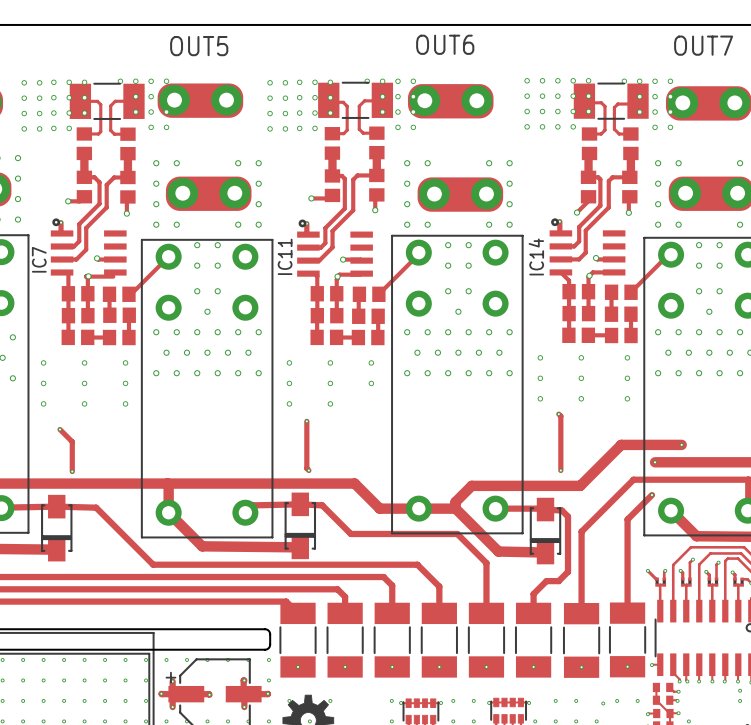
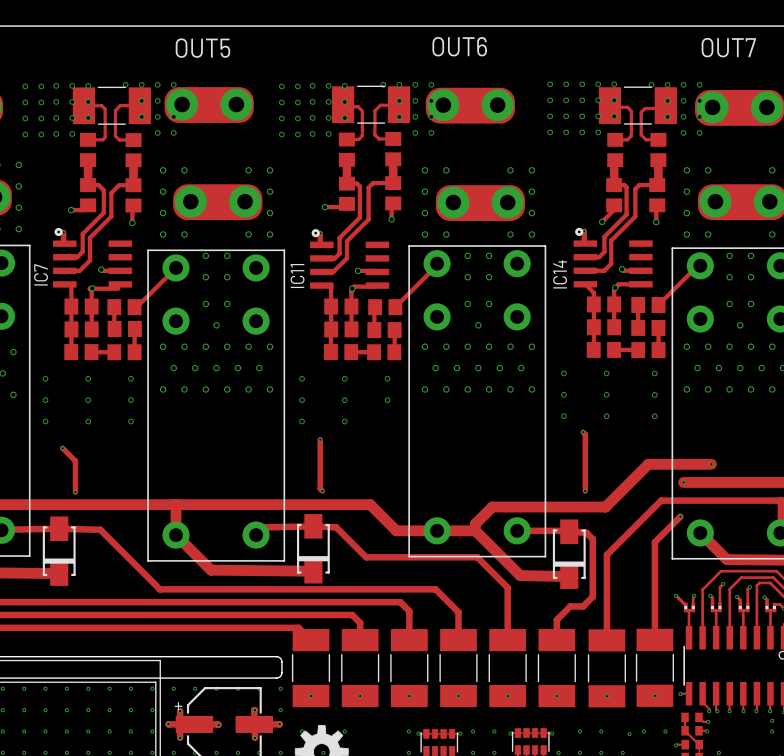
track: (678, 713) (669, 713) -> none
via: (678, 713) -> none

